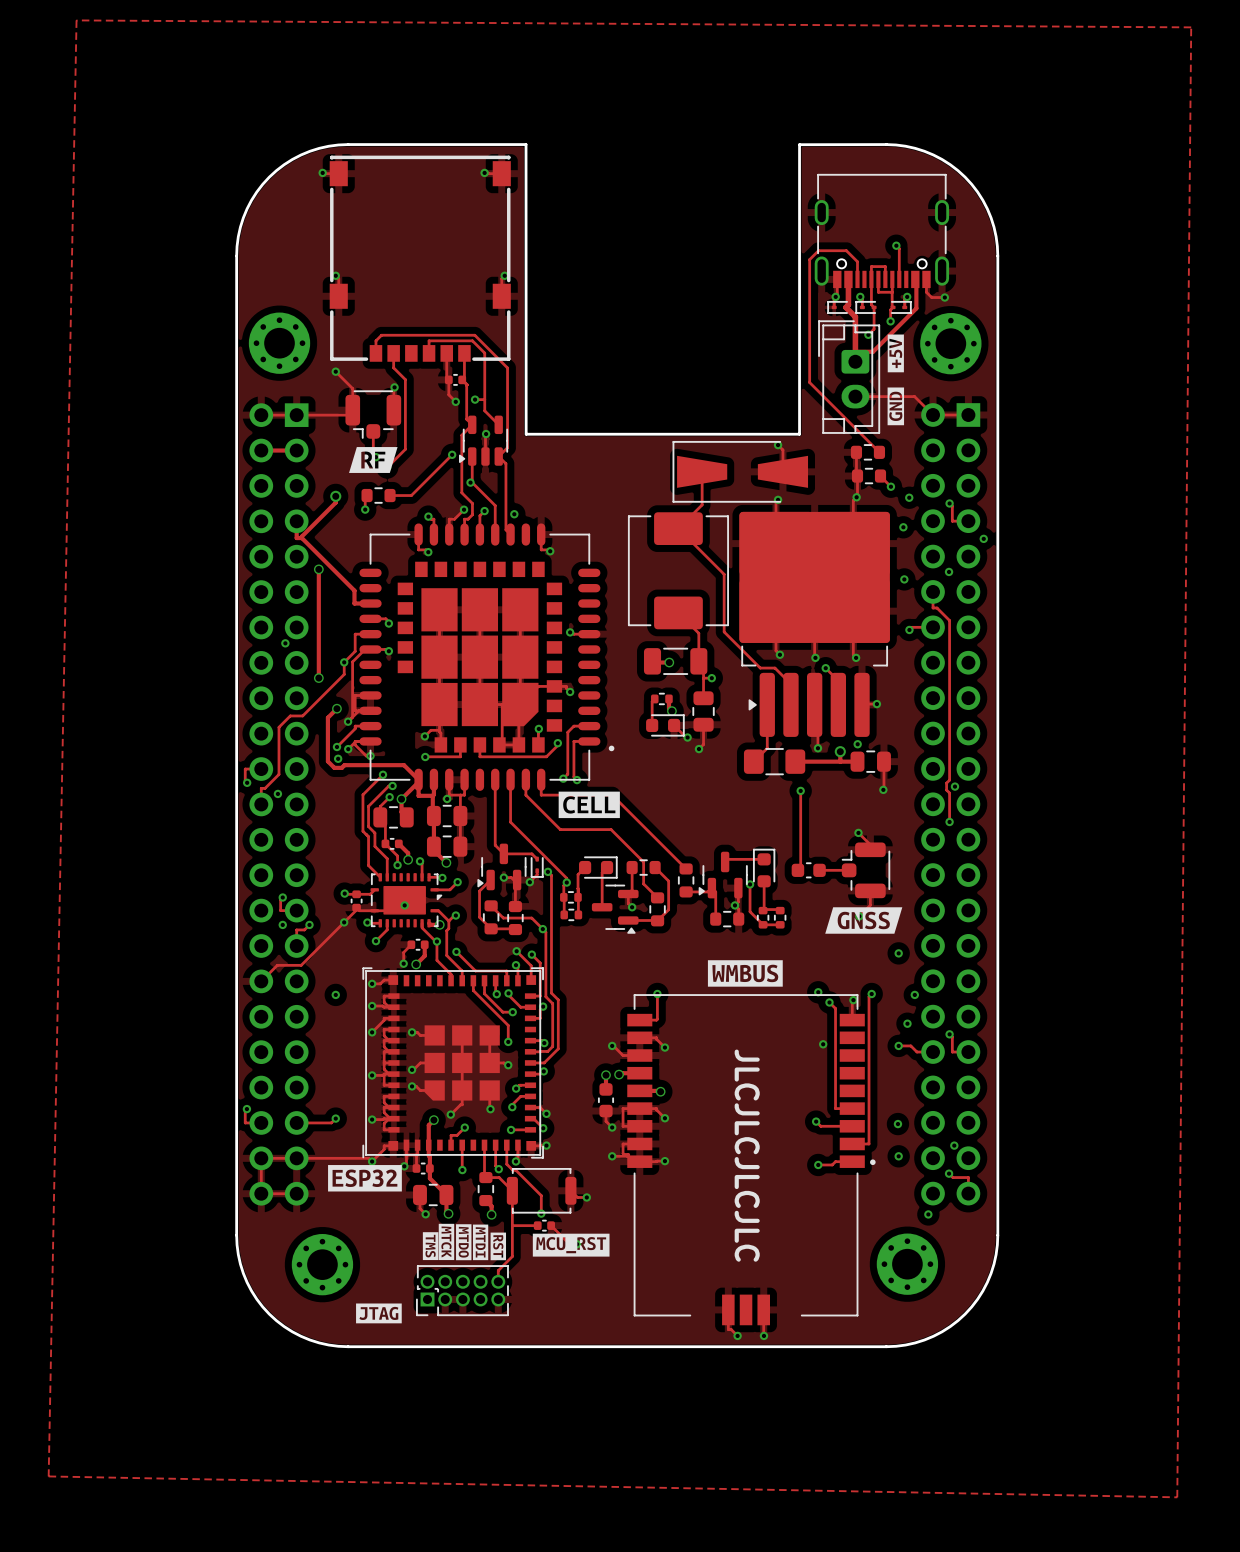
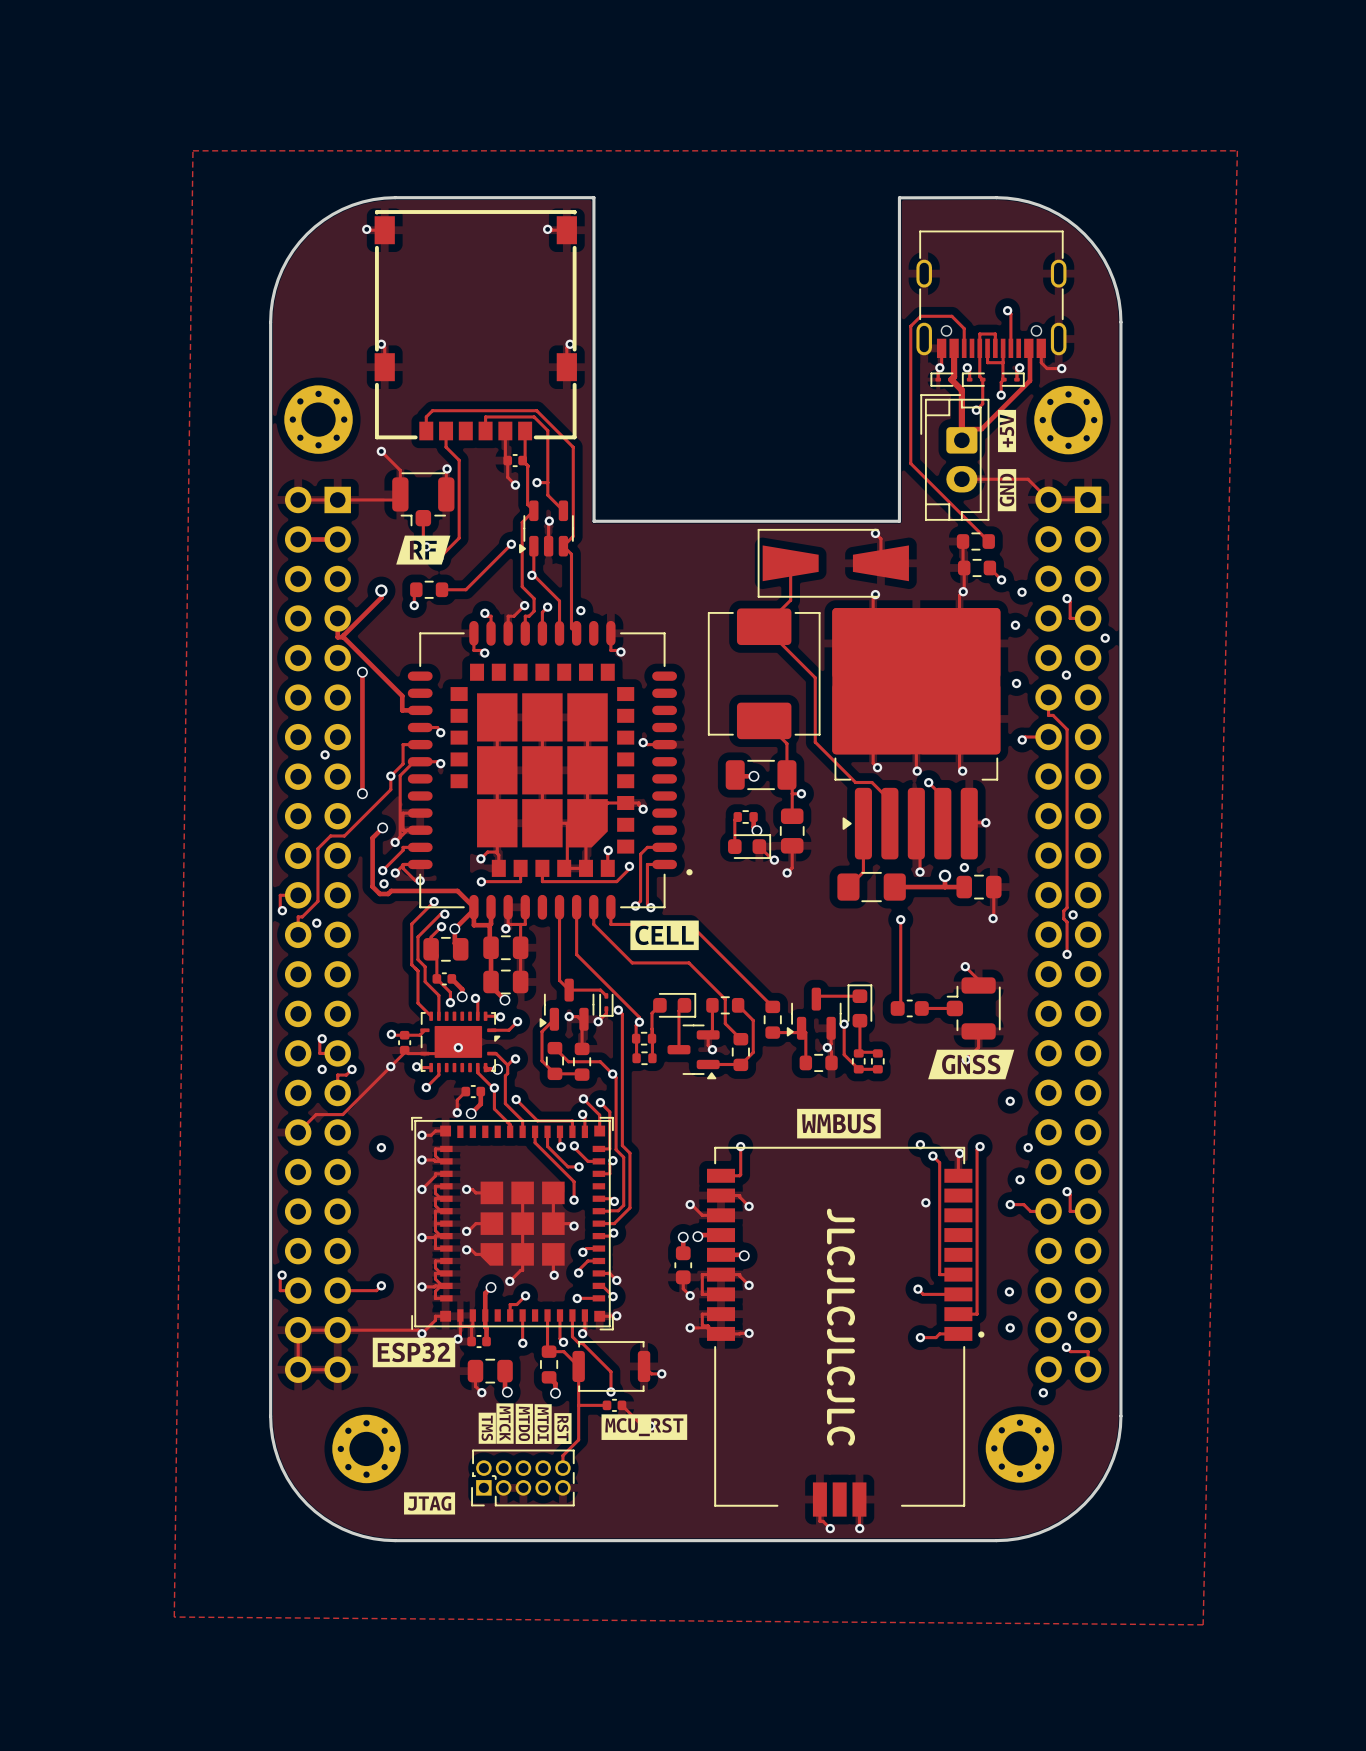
zone outline: (76, 20) (48, 1476) (1177, 1497) (1191, 27) (76, 20) -> (192, 150) (174, 1617) (1203, 1624) (1237, 150) (192, 150)
track: (429, 1168) (429, 1178) (446, 1194) -> none

